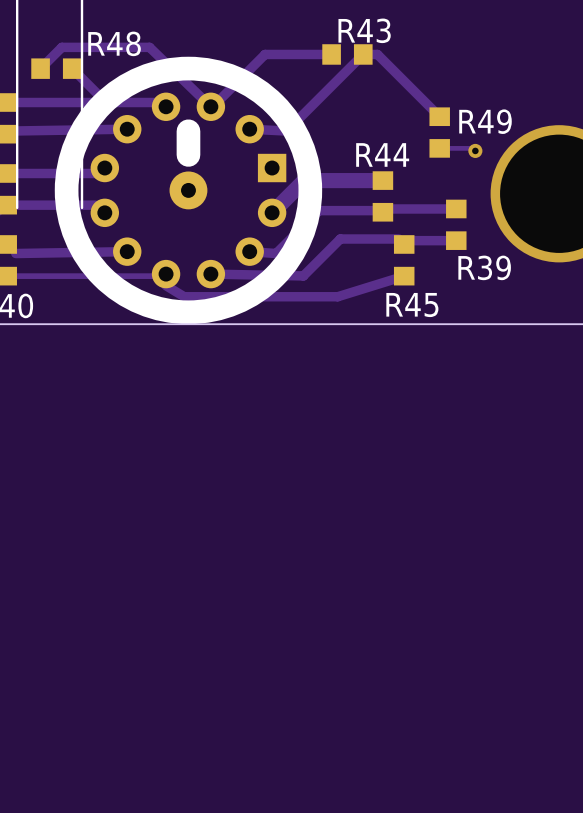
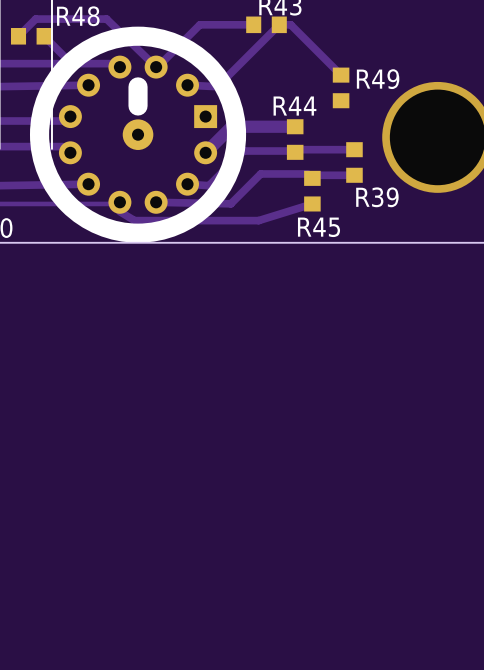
track: (439, 148) (472, 148) (475, 150) -> none
via: (475, 150) -> none

